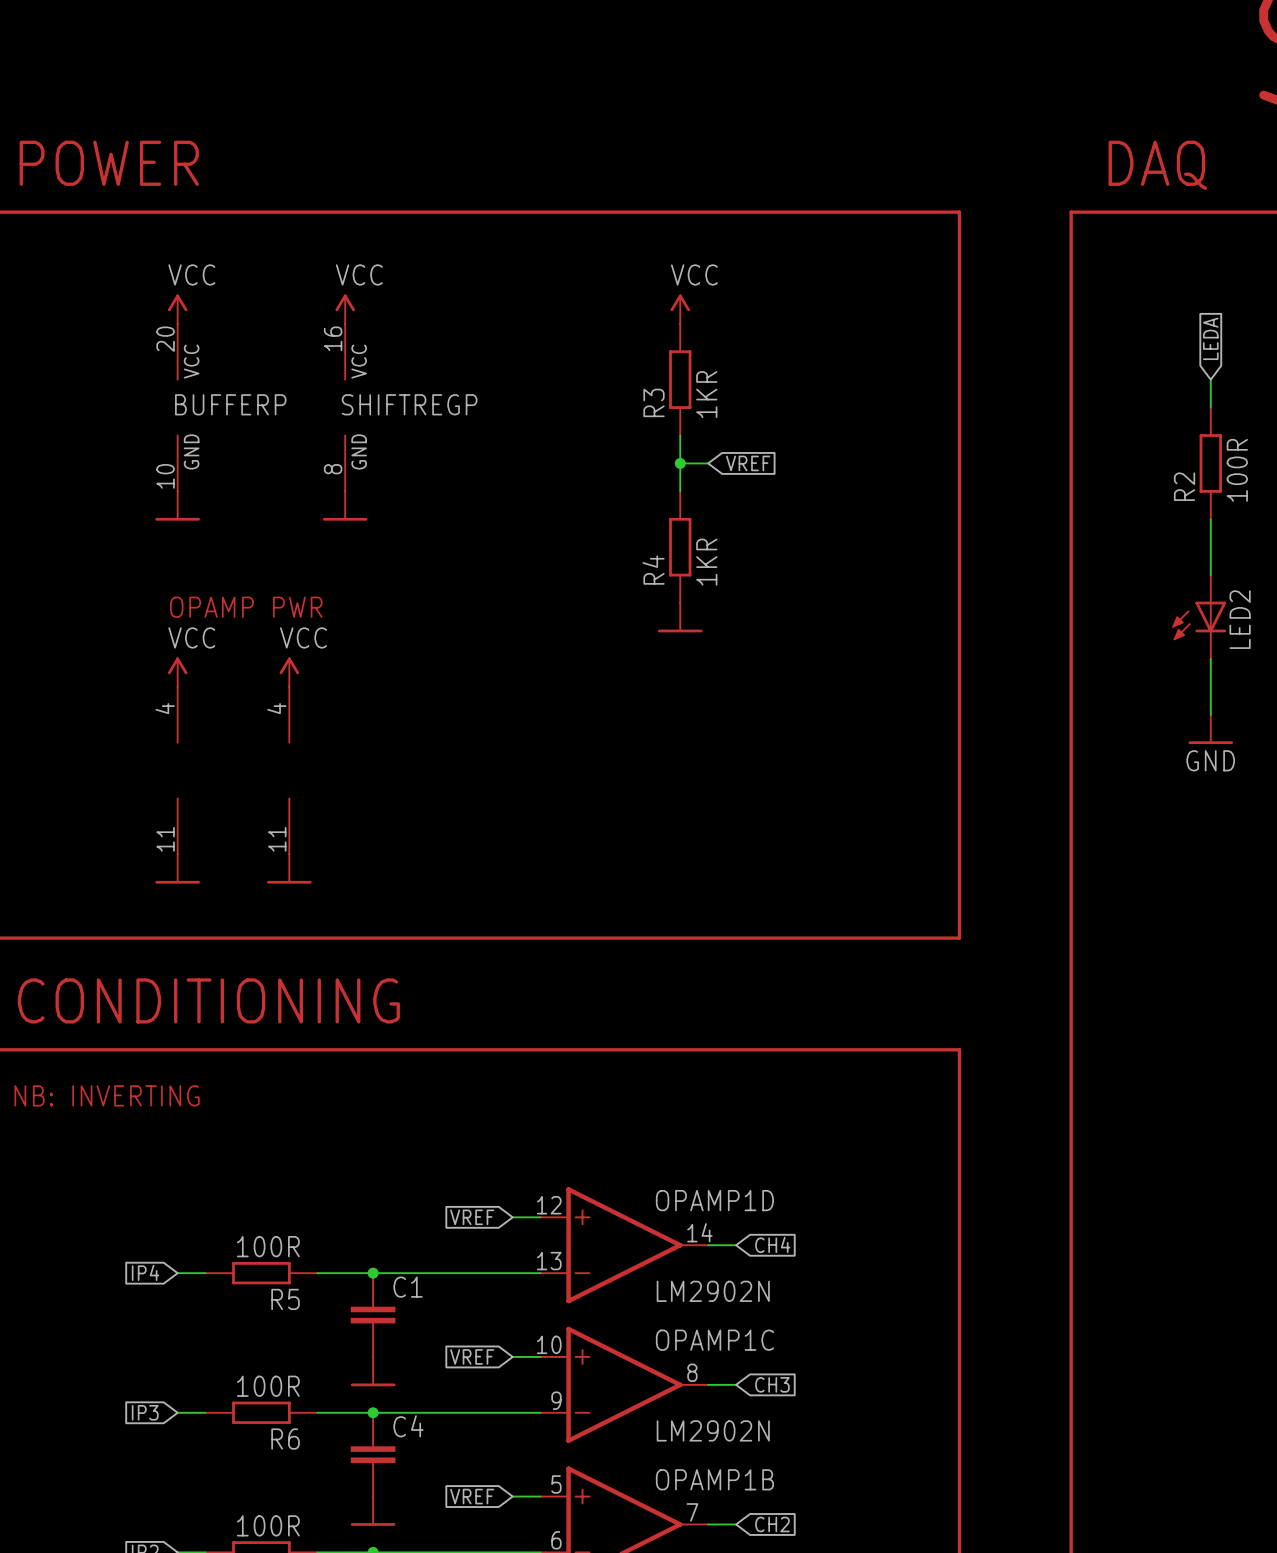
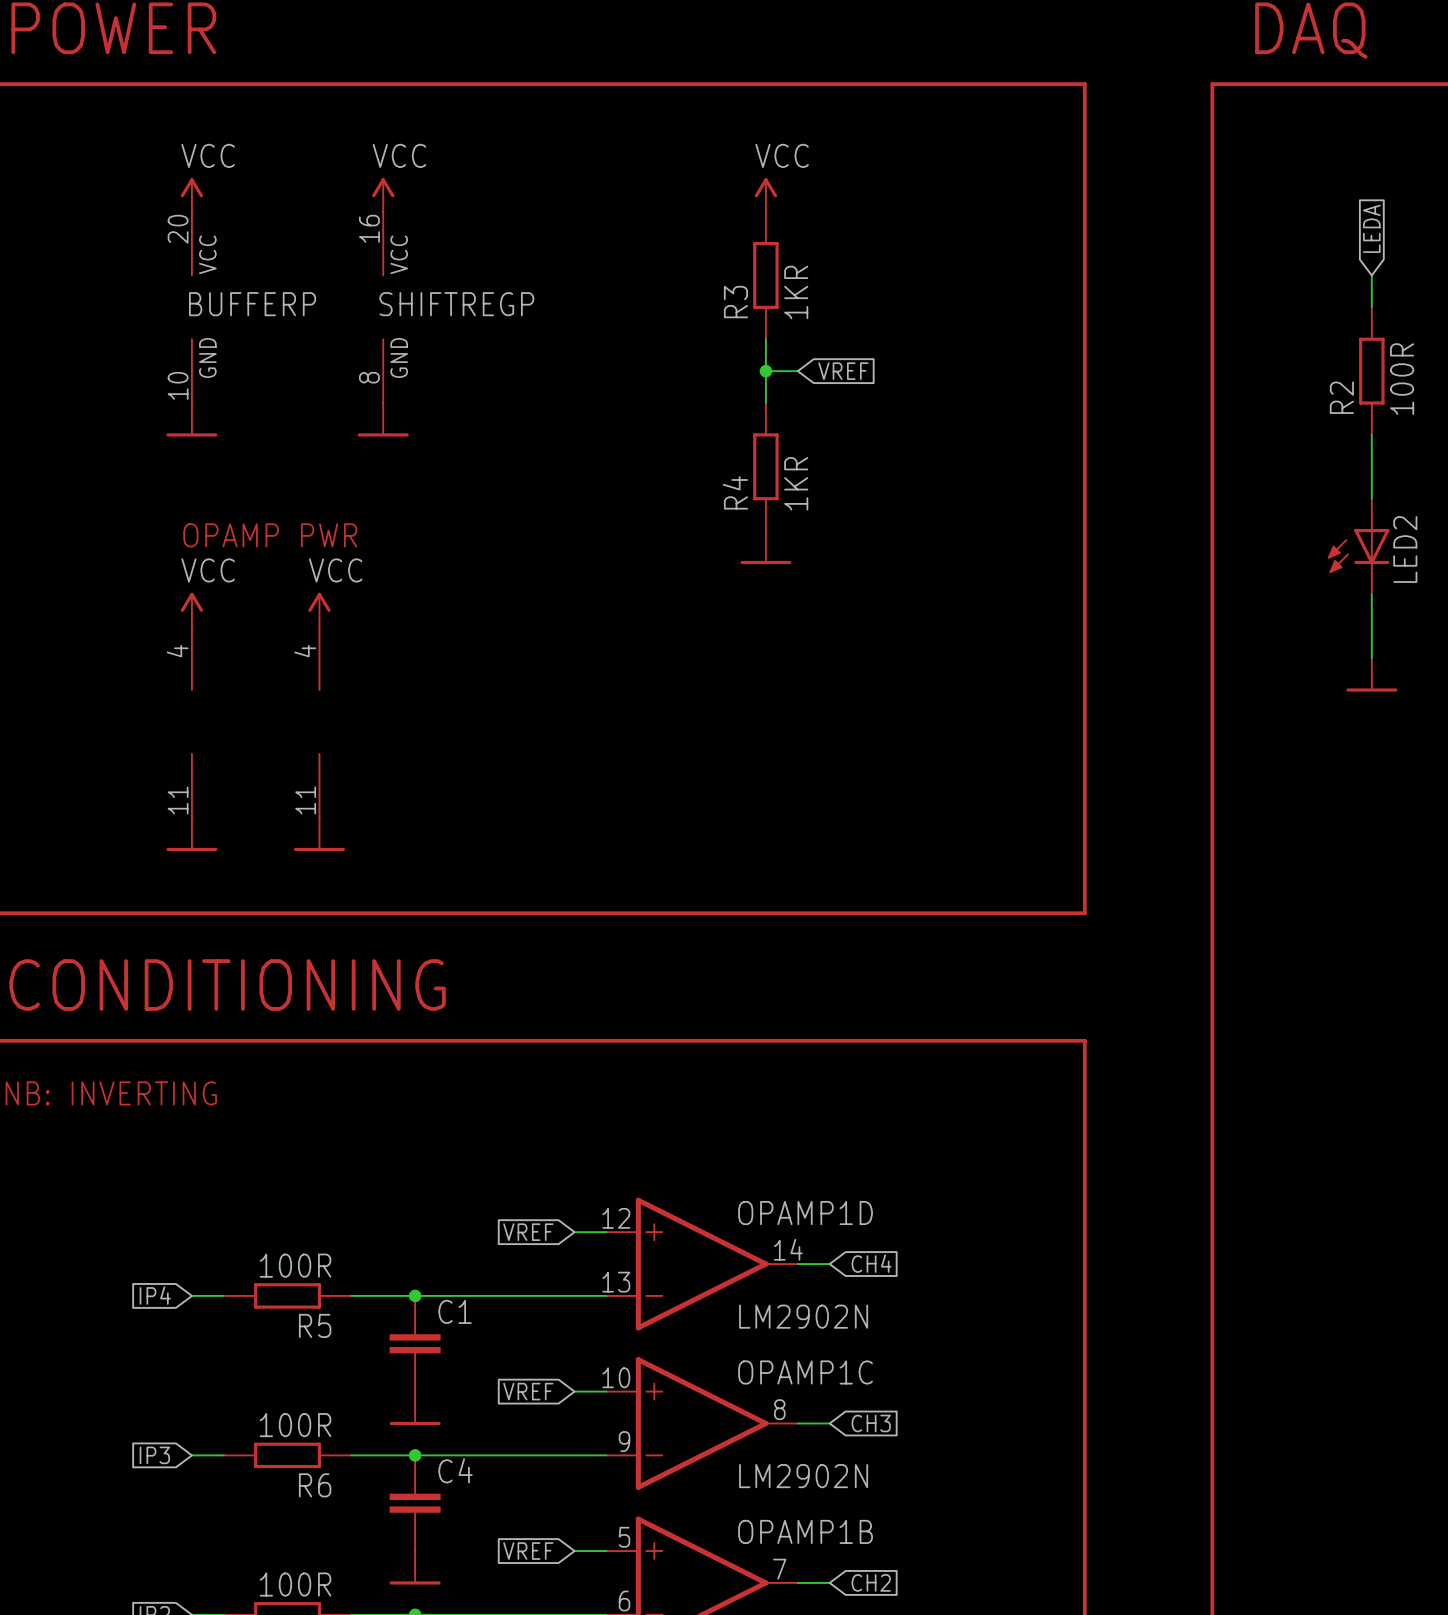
power symbol text: GND (1210, 760) -> none

